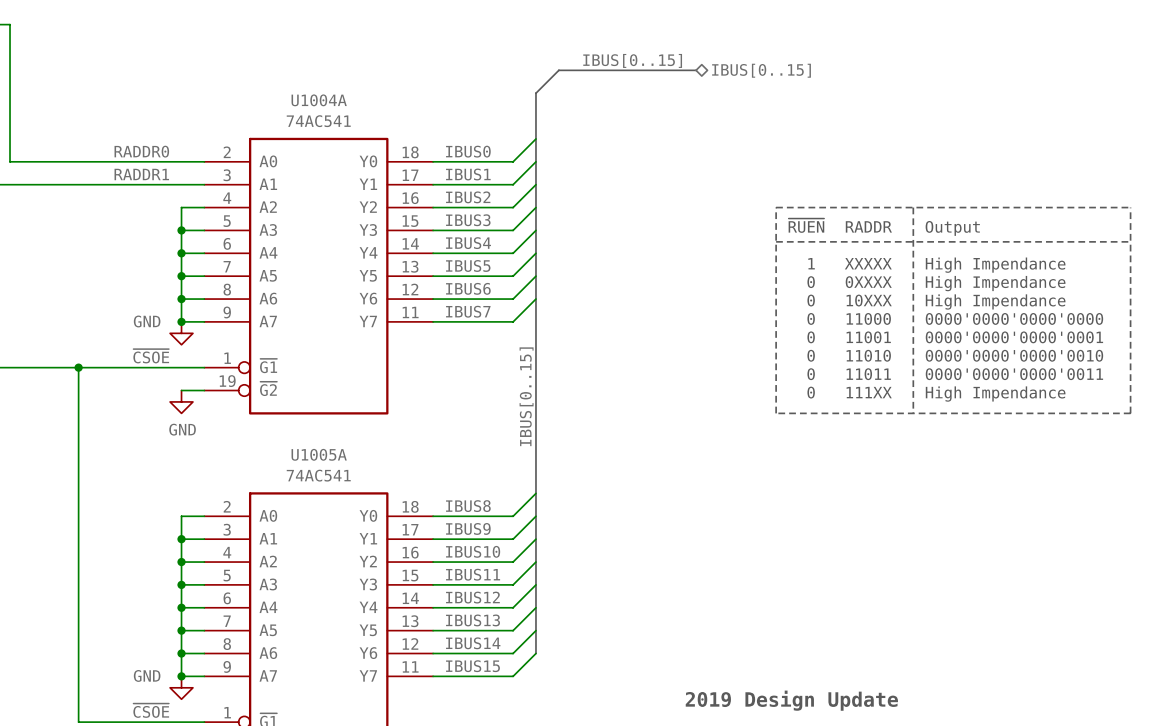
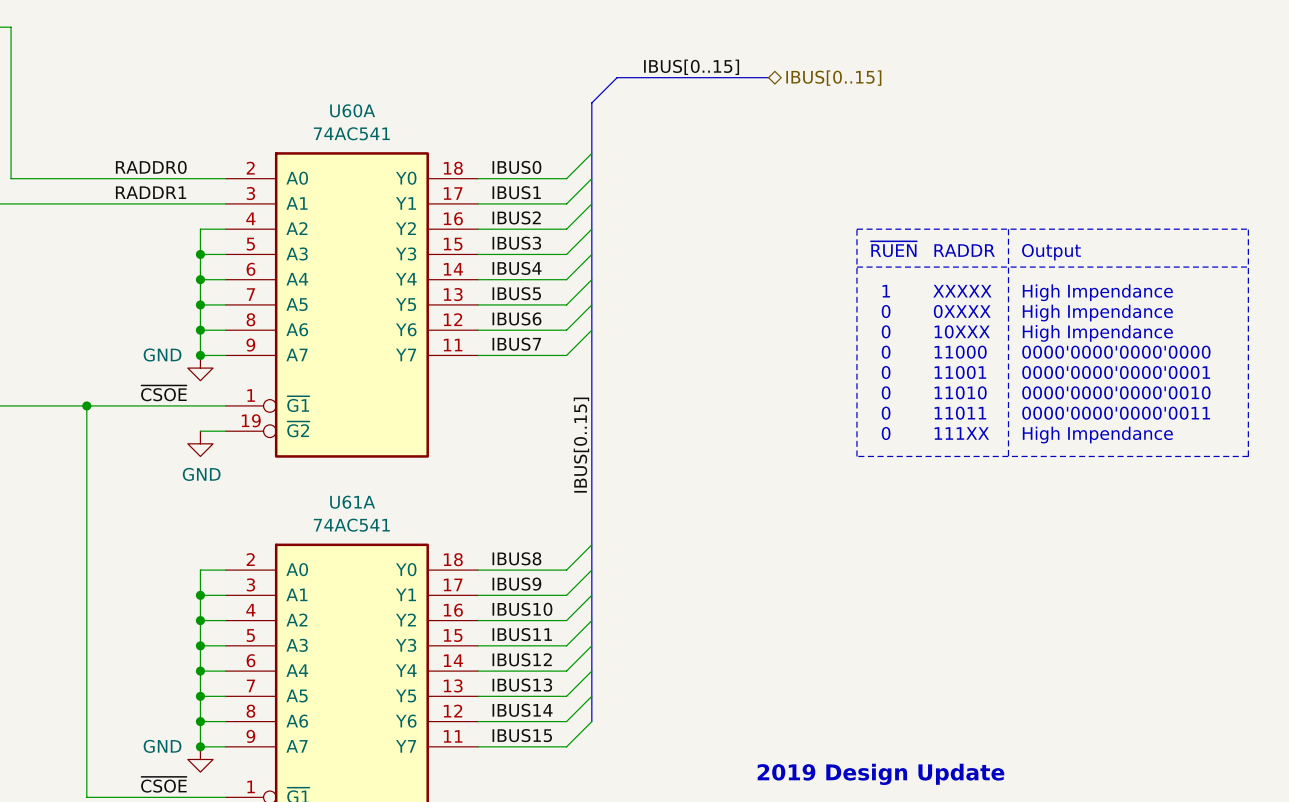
U1004A name: U1004A (319, 100) -> U60A (352, 110)
U1005A name: U1005A (319, 454) -> U61A (352, 502)

